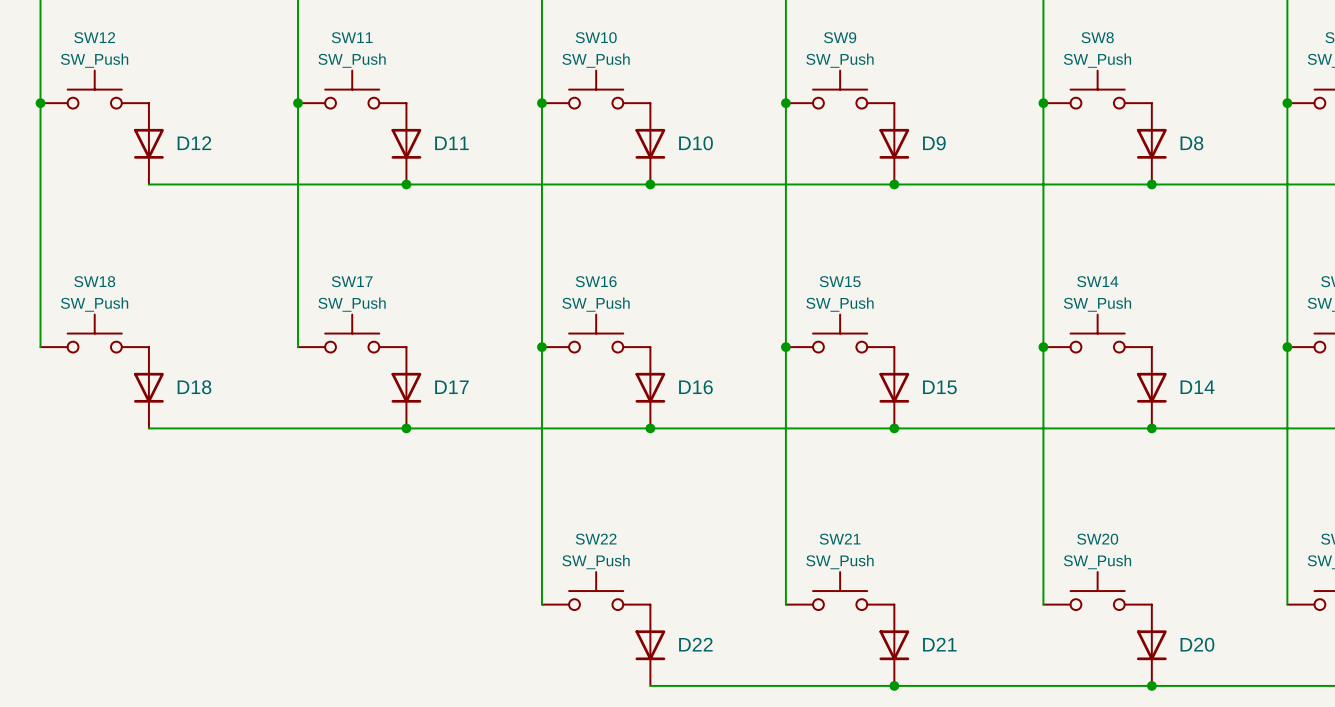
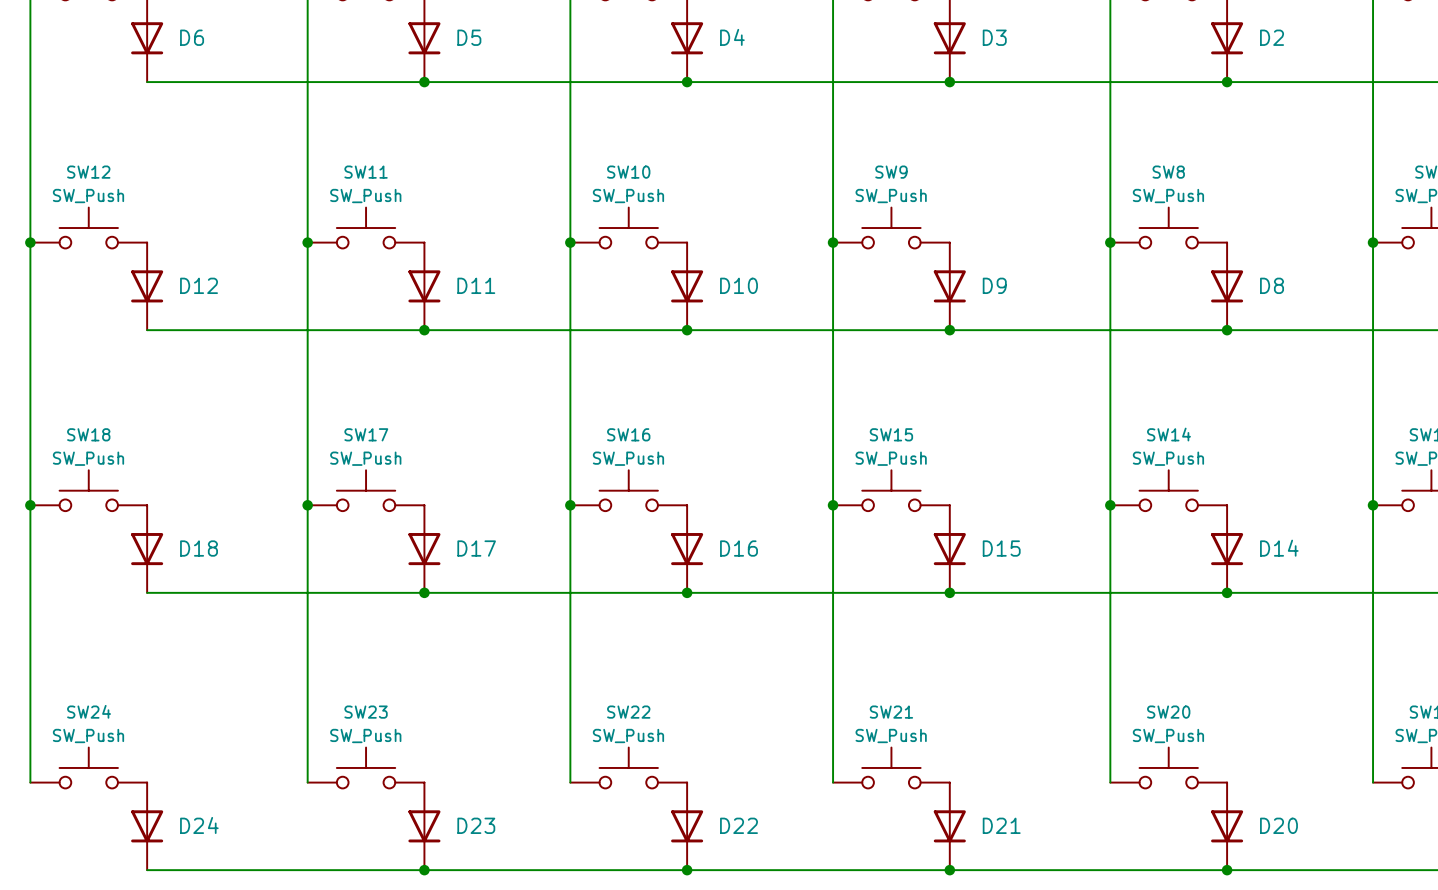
wire: none -> (30, 505) (30, 782)
junction: none -> (30, 505)
wire: none -> (307, 505) (307, 782)
junction: none -> (307, 505)
SW24: none -> SW_Push (88, 767)
SW23: none -> SW_Push (366, 767)
D24: none -> (147, 826)
D23: none -> (424, 826)
wire: none -> (147, 870) (687, 870)
junction: none -> (424, 870)
junction: none -> (687, 870)

